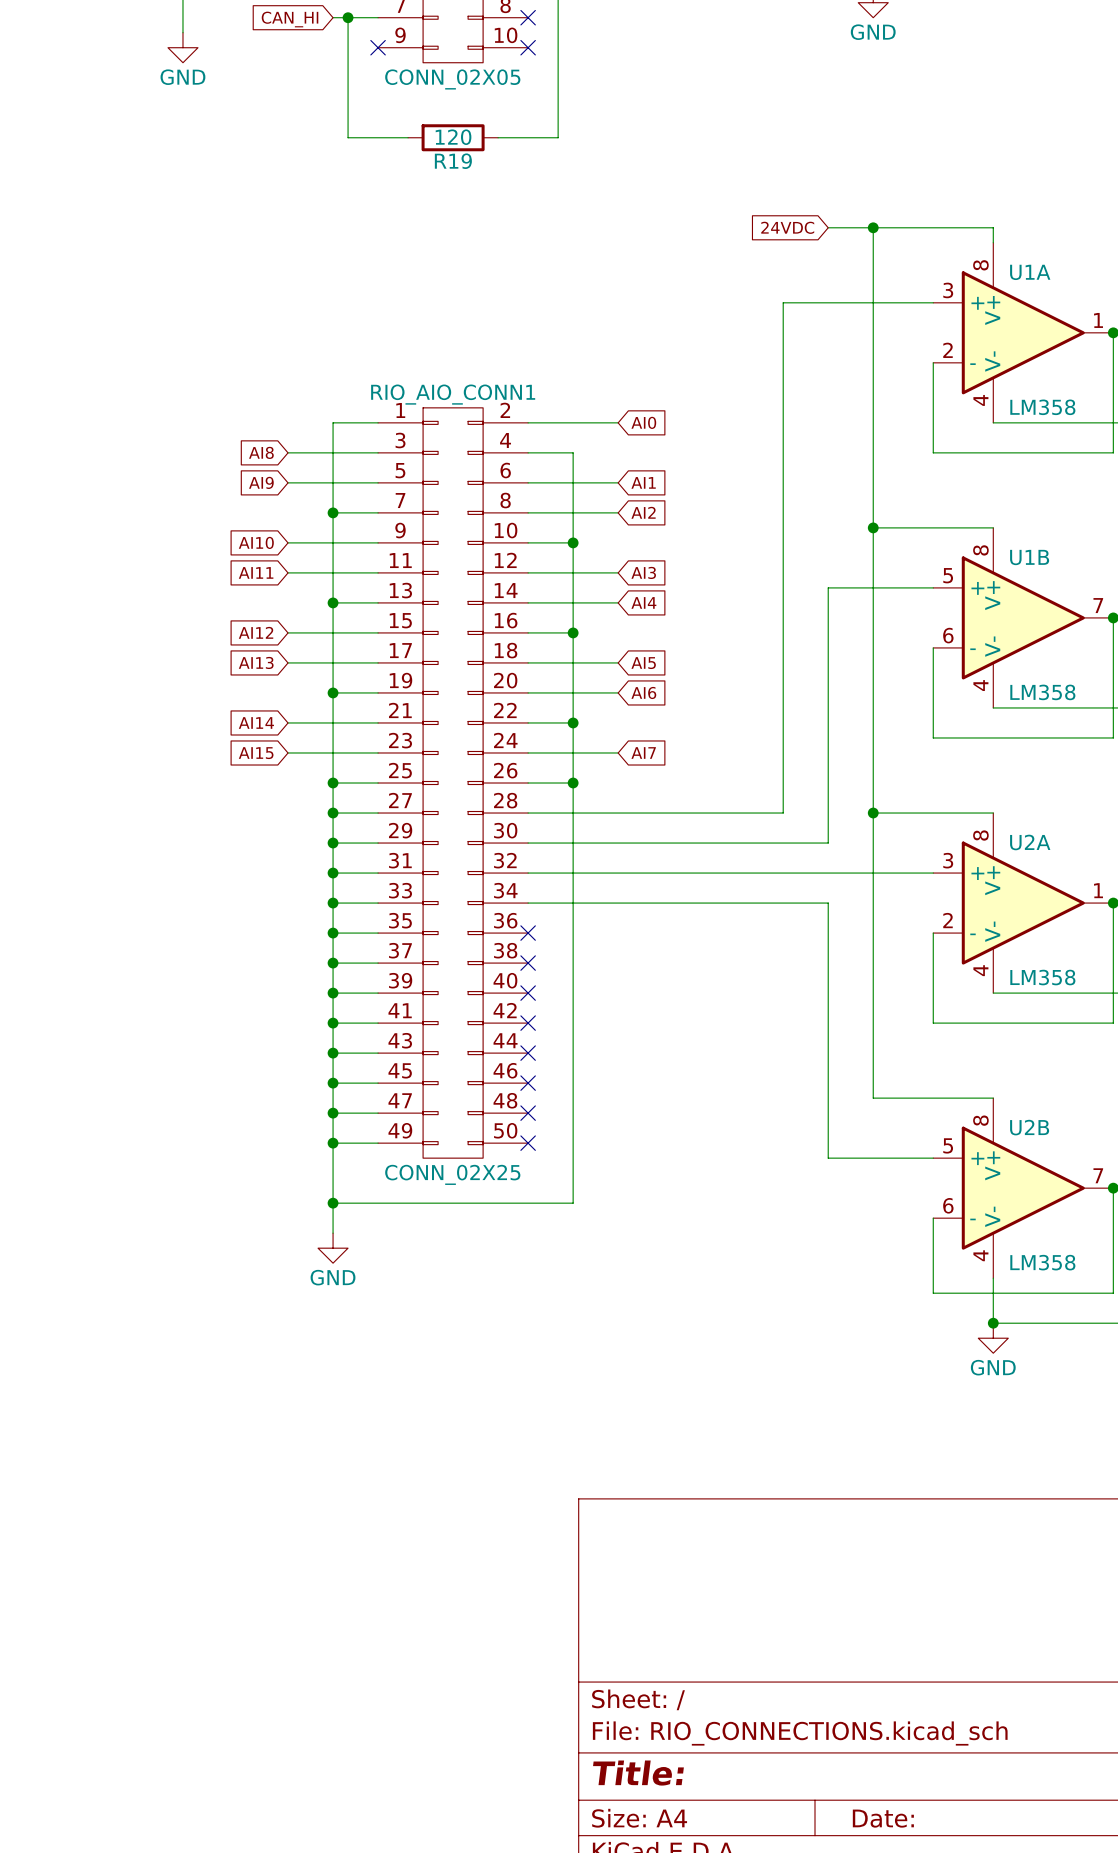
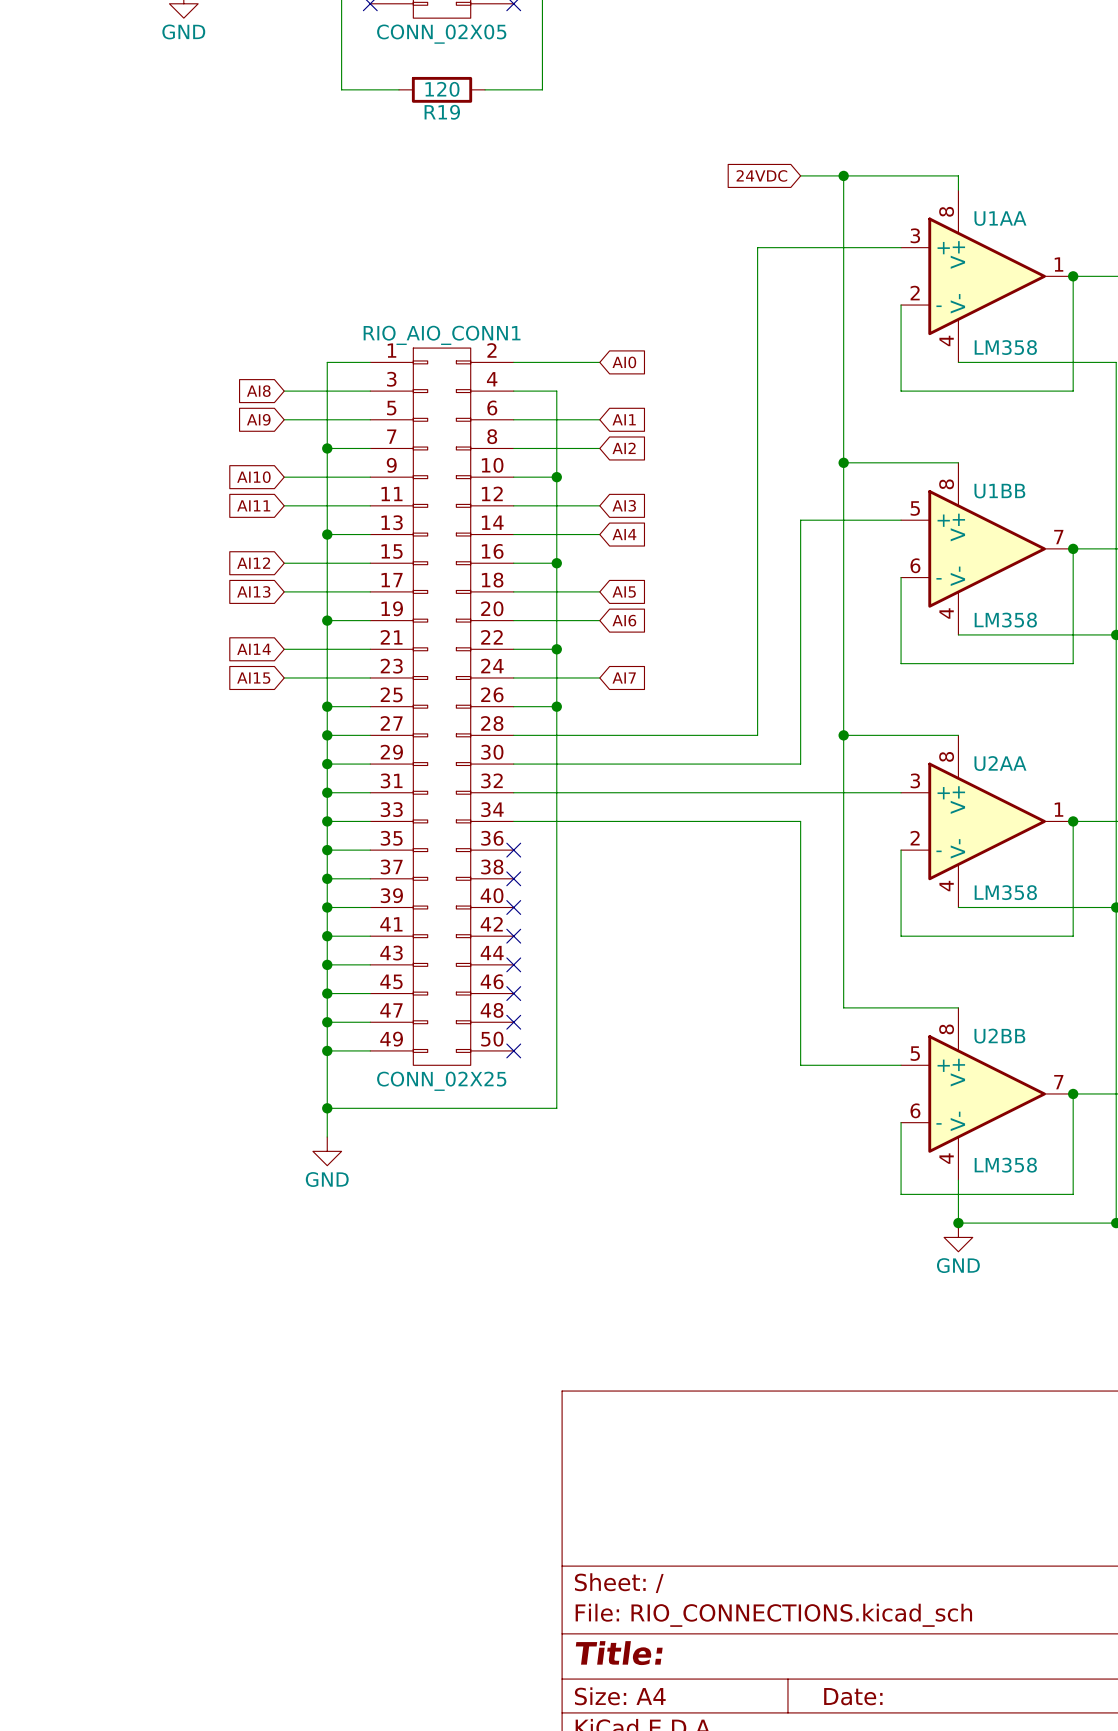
U1A name: U1A (1030, 272) -> U1AA (1000, 218)
U1B name: U1B (1029, 557) -> U1BB (999, 491)
U2A name: U2A (1030, 842) -> U2AA (1000, 763)
U2B name: U2B (1029, 1127) -> U2BB (999, 1036)

